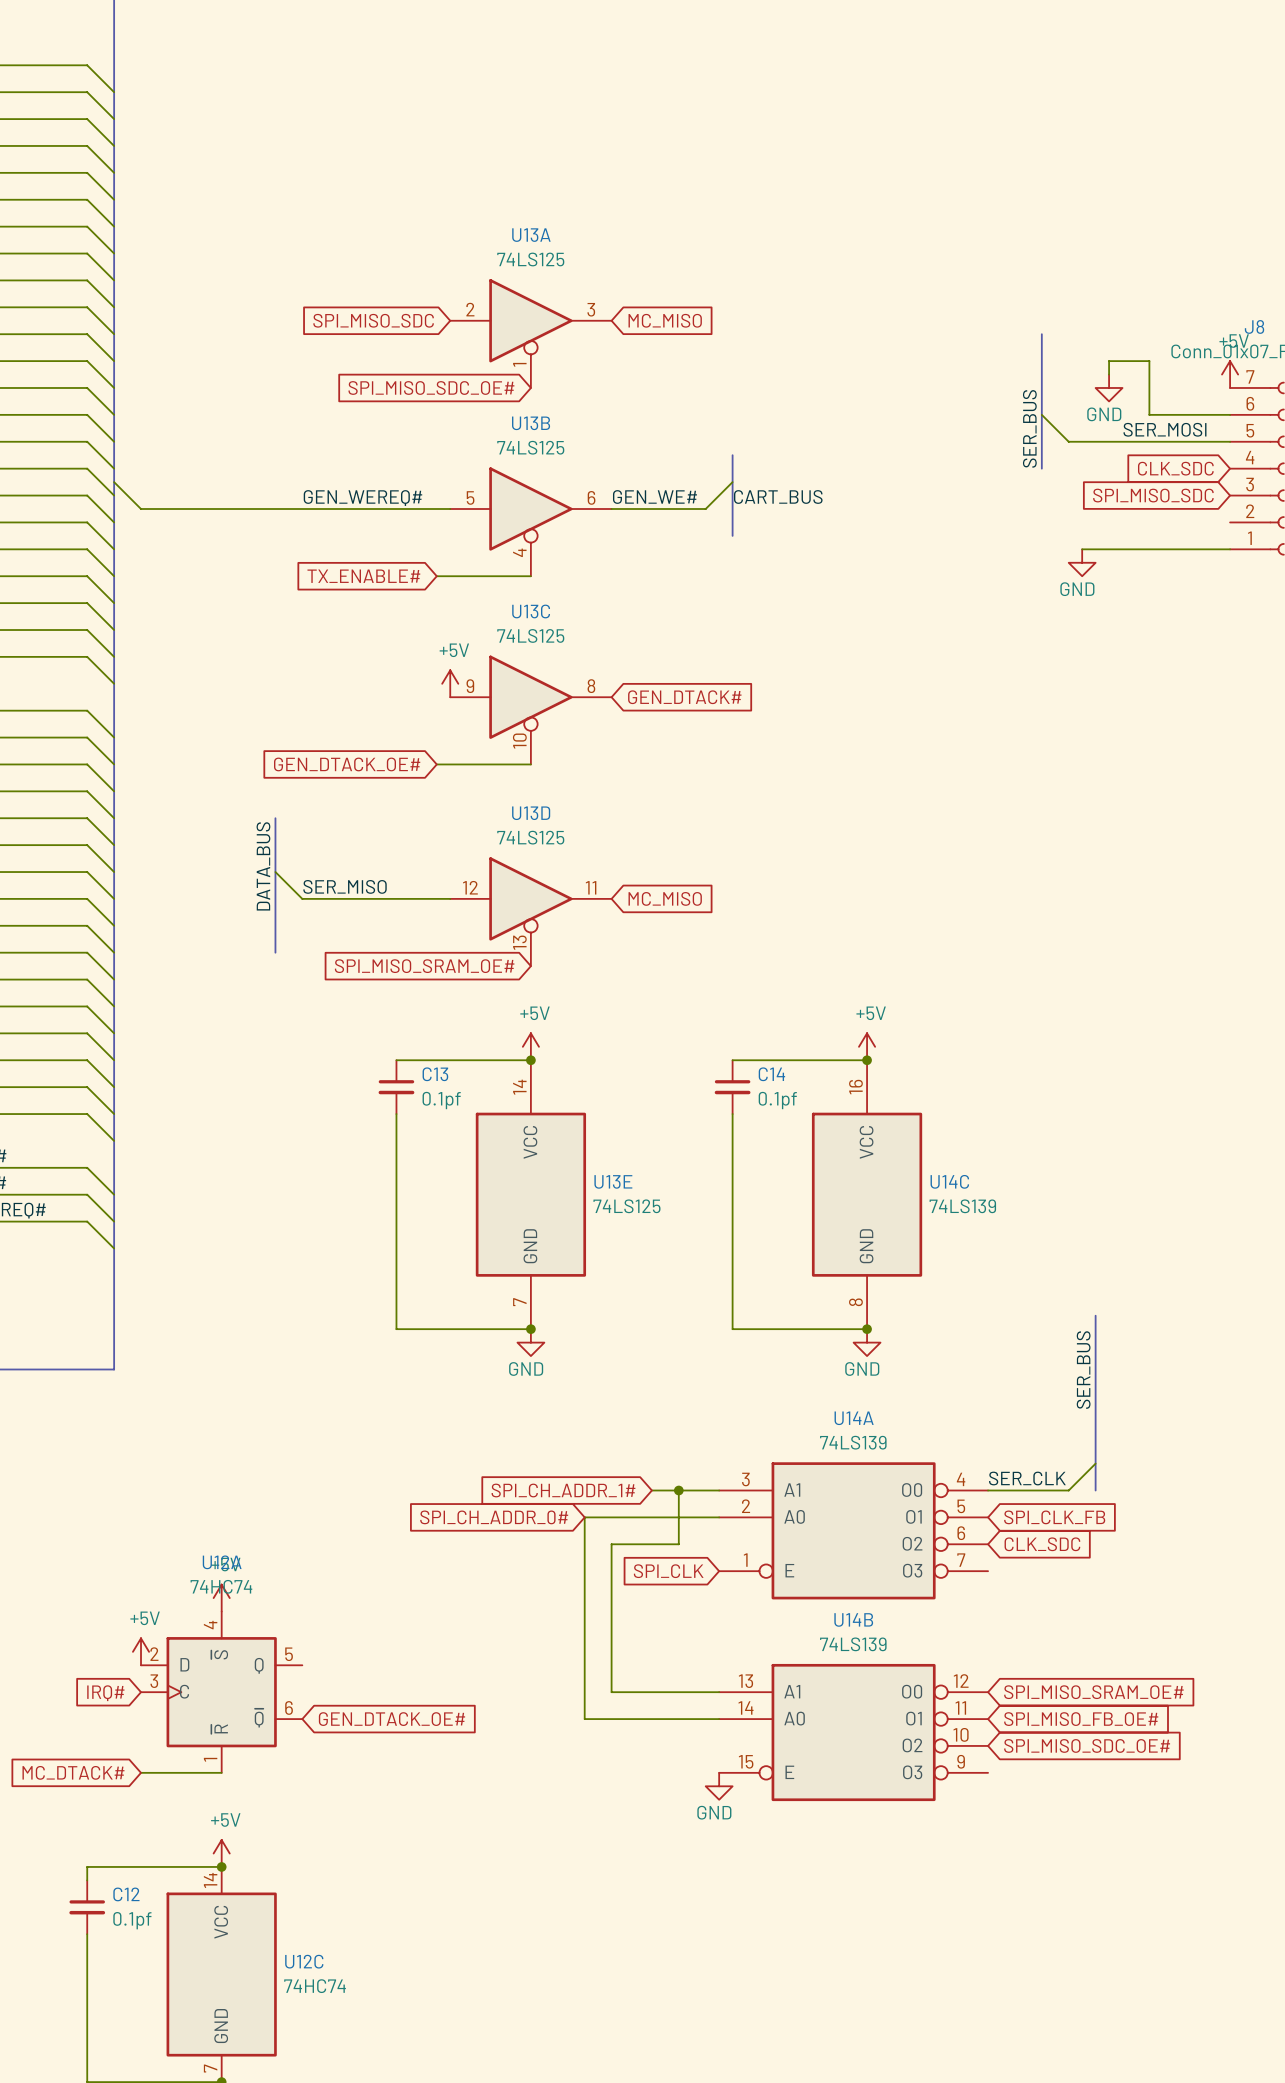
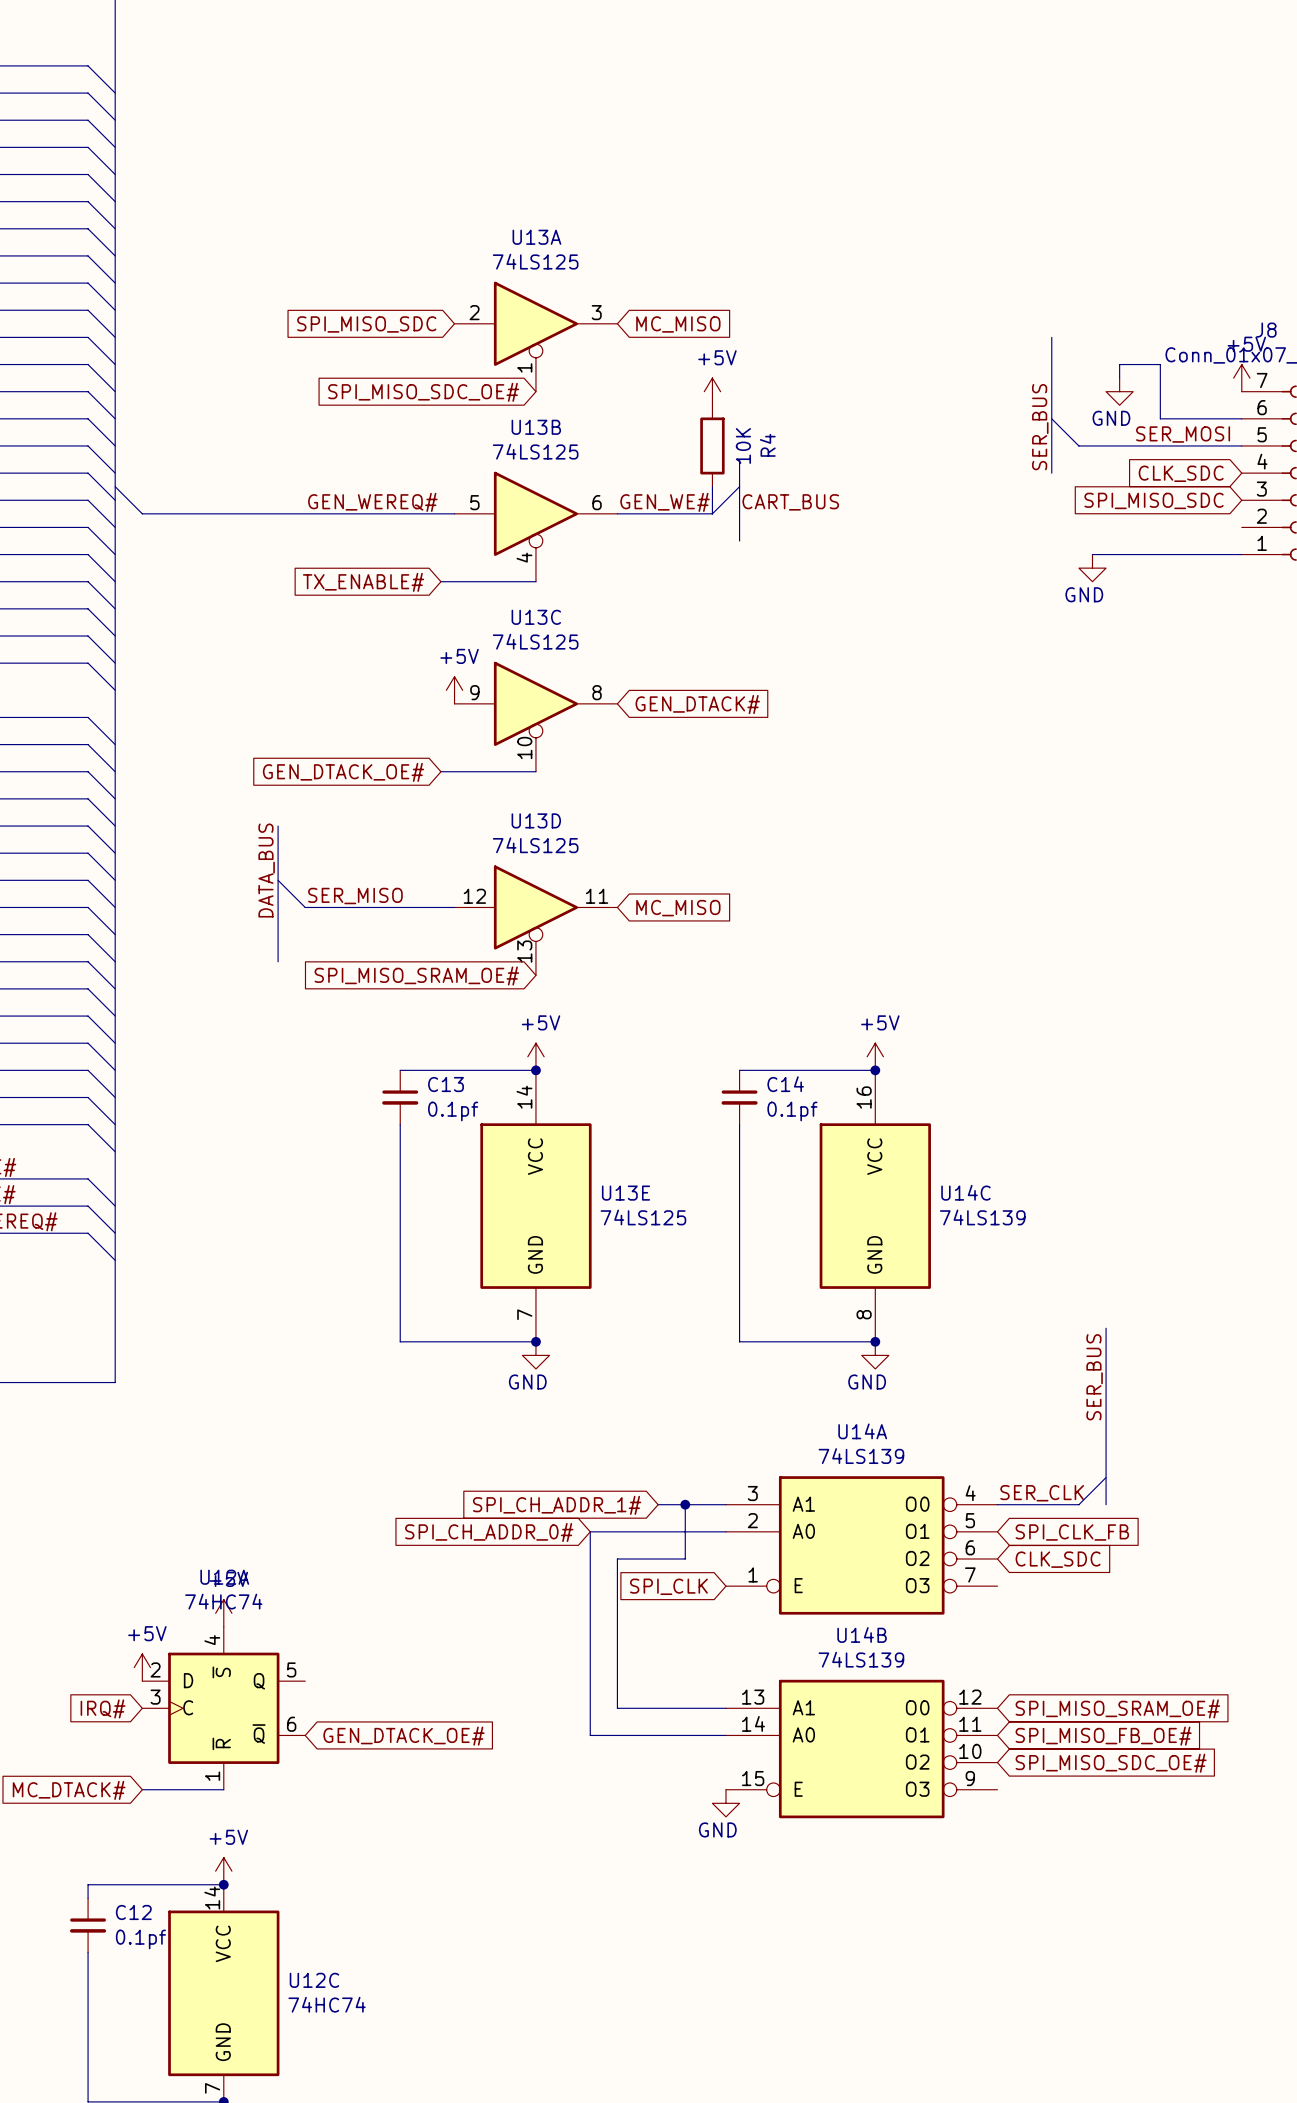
power symbol: none -> +5V (712, 391)
R4: none -> 10K (712, 445)
wire: none -> (712, 486) (712, 513)

